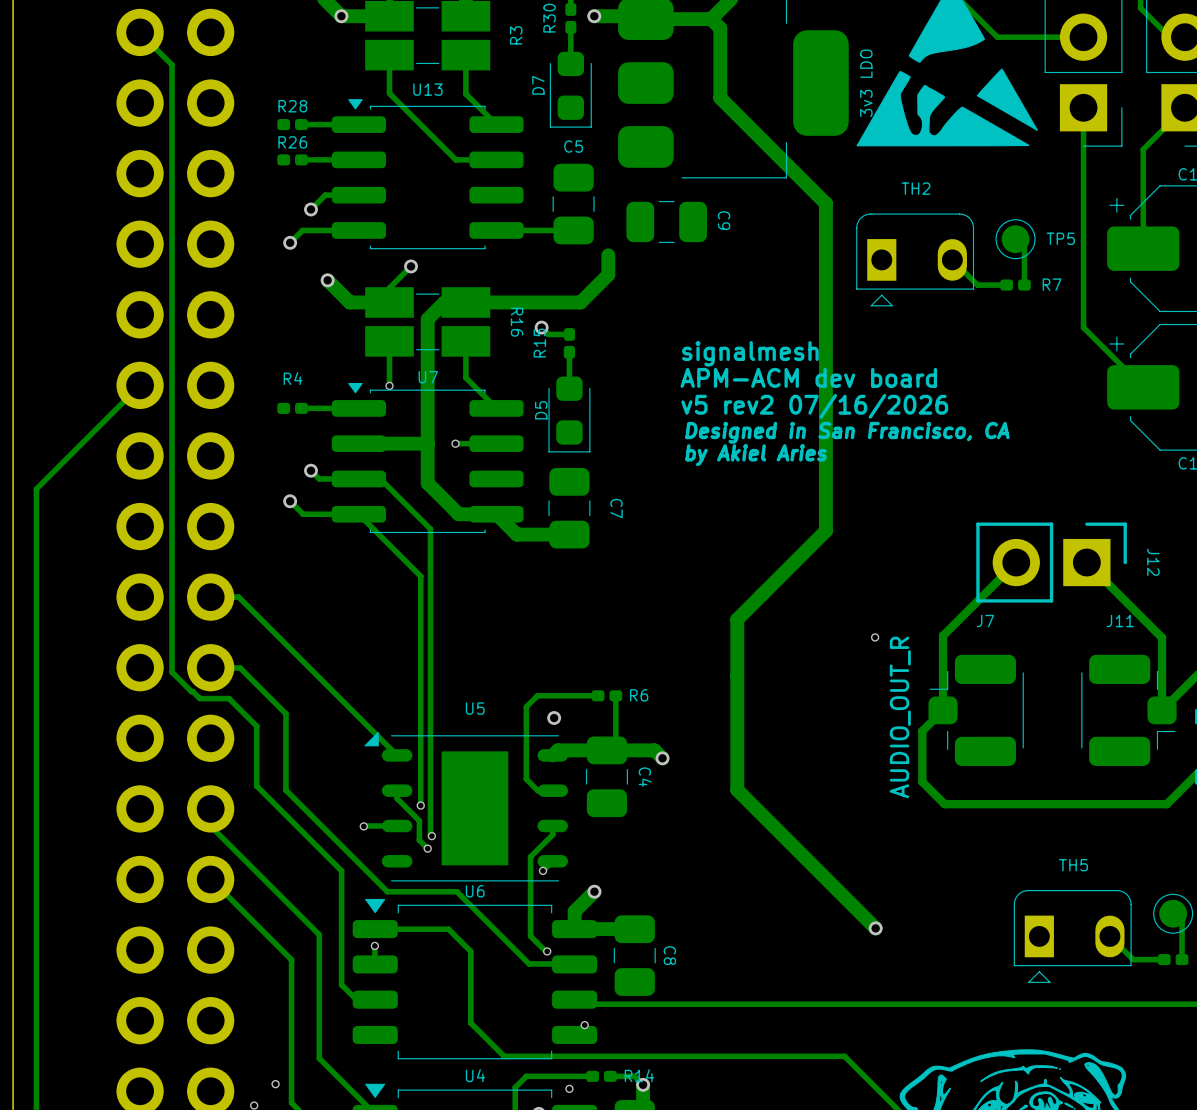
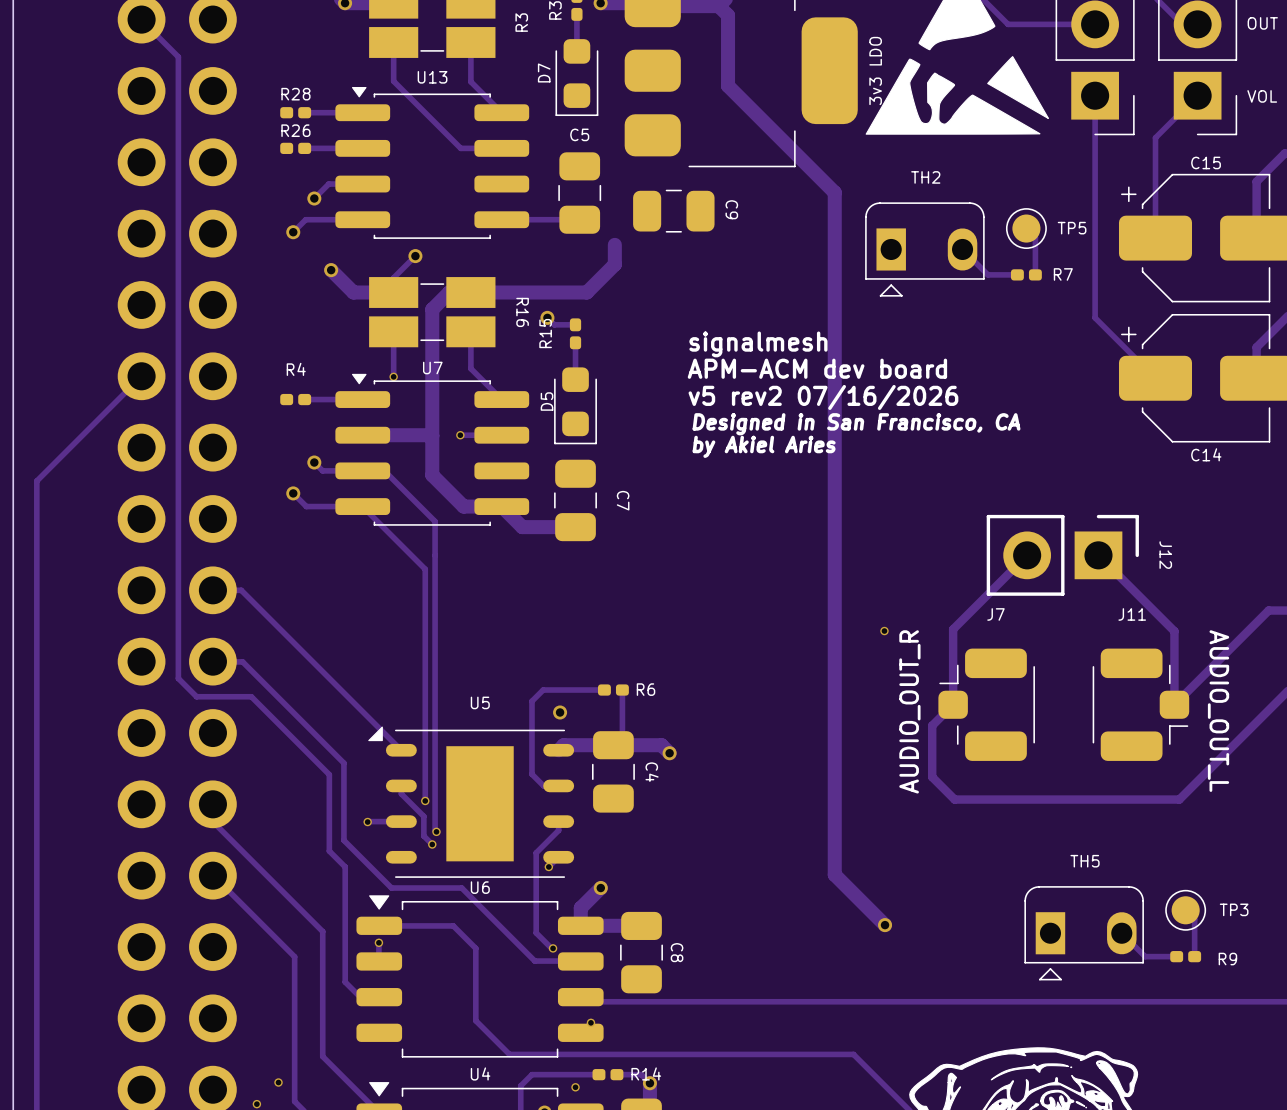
track: (172, 64) (172, 672) (199, 698) (229, 698) (256, 726) (256, 786) (325, 855) -> (173, 52) (178, 56) (178, 678) (196, 696) (251, 696) (329, 774) (329, 851)
track: (825, 530) (737, 619) (737, 790) (825, 878) -> (834, 523) (834, 874)
track: (285, 713) (285, 790) (340, 844) -> (289, 708) (343, 763) (343, 840)

